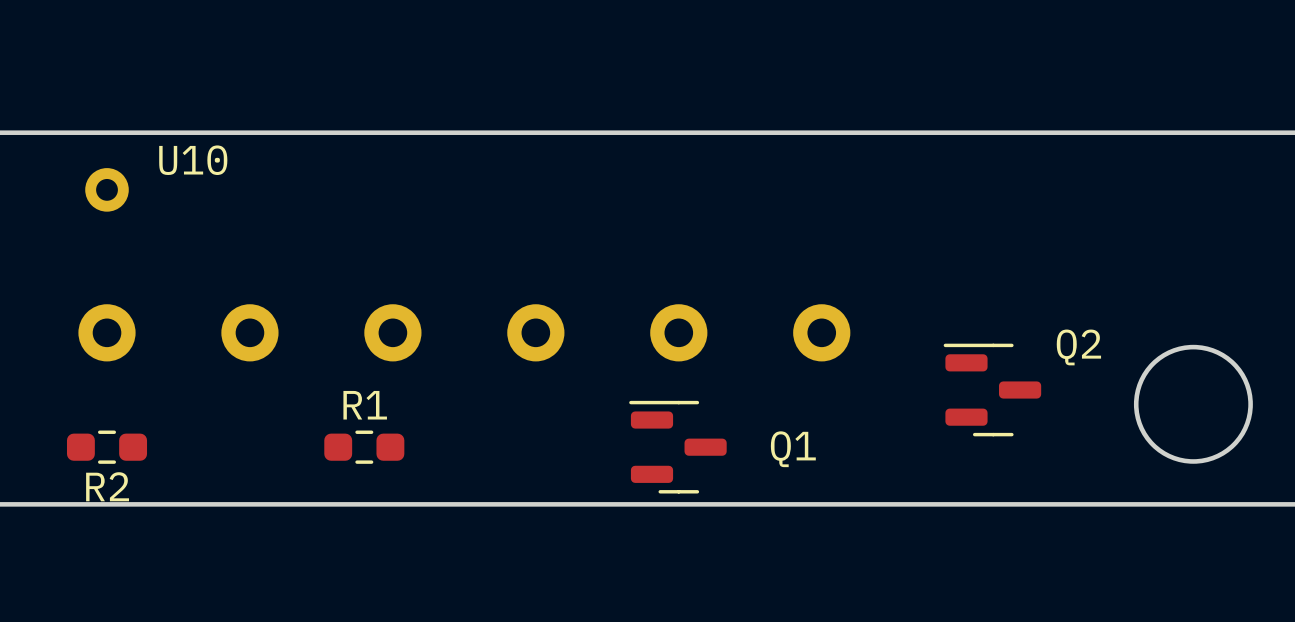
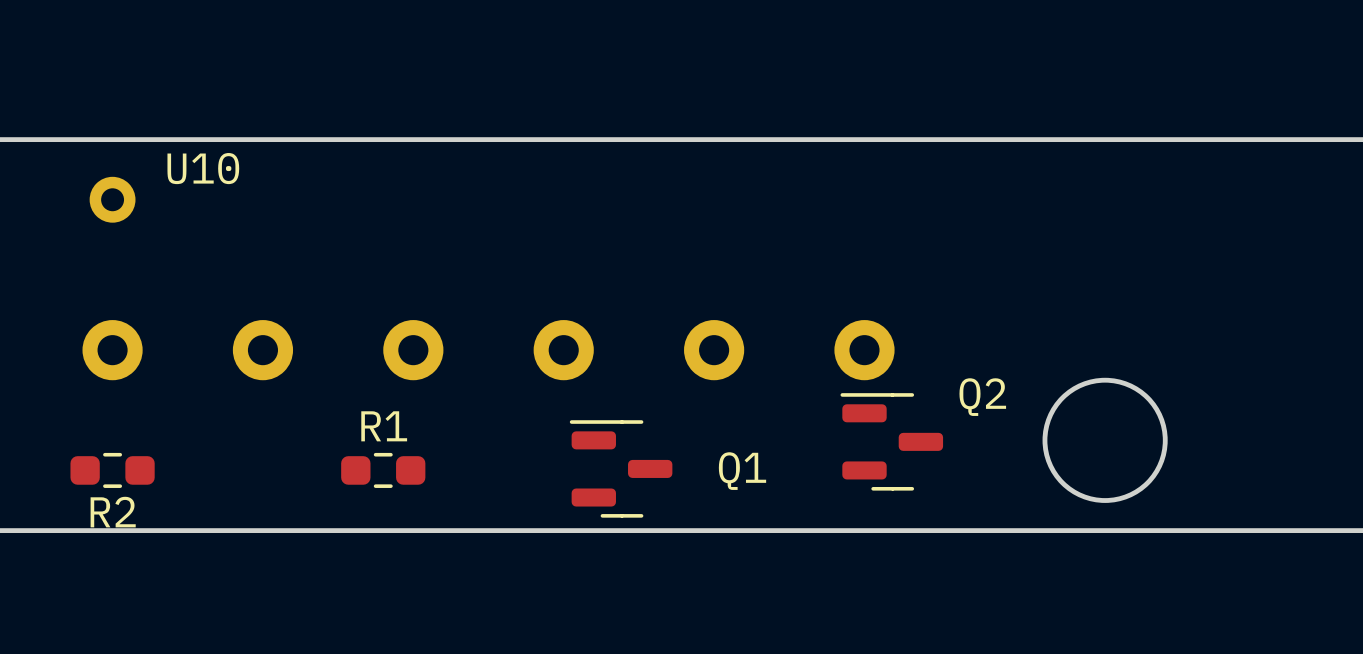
Q2 position: (992, 390) -> (891, 441)
round board edge position: (1193, 404) -> (1105, 440)
Q1 position: (677, 447) -> (621, 468)

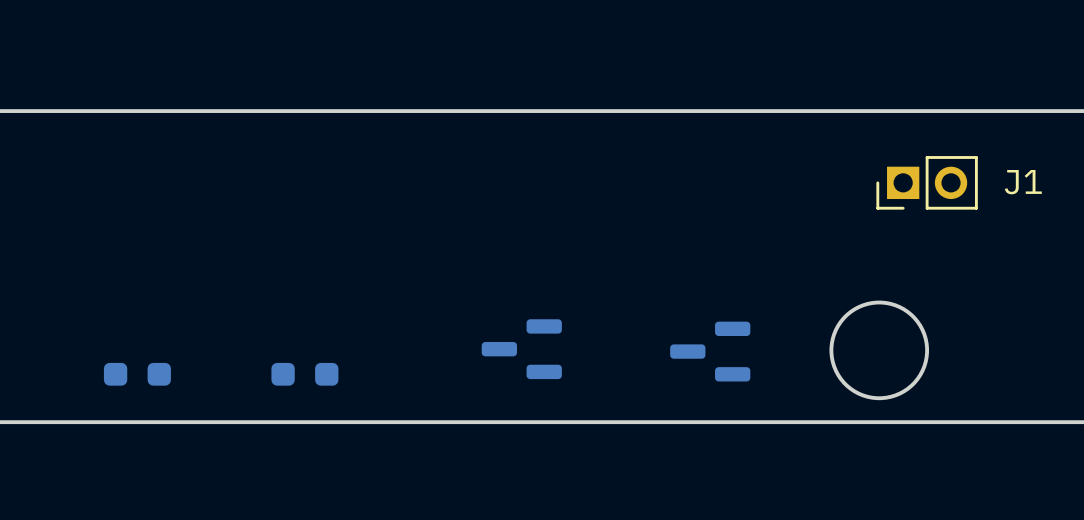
U10: (112, 199) -> none
J1: none -> (927, 182)
part: (112, 350) -> none
part: (262, 350) -> none
part: (413, 350) -> none
part: (563, 350) -> none
part: (714, 350) -> none
part: (864, 350) -> none
Q2 side: top (891, 441) -> bottom (710, 351)
Q1 side: top (621, 468) -> bottom (521, 349)
R2 side: top (112, 470) -> bottom (137, 374)
R1 side: top (383, 470) -> bottom (304, 374)

